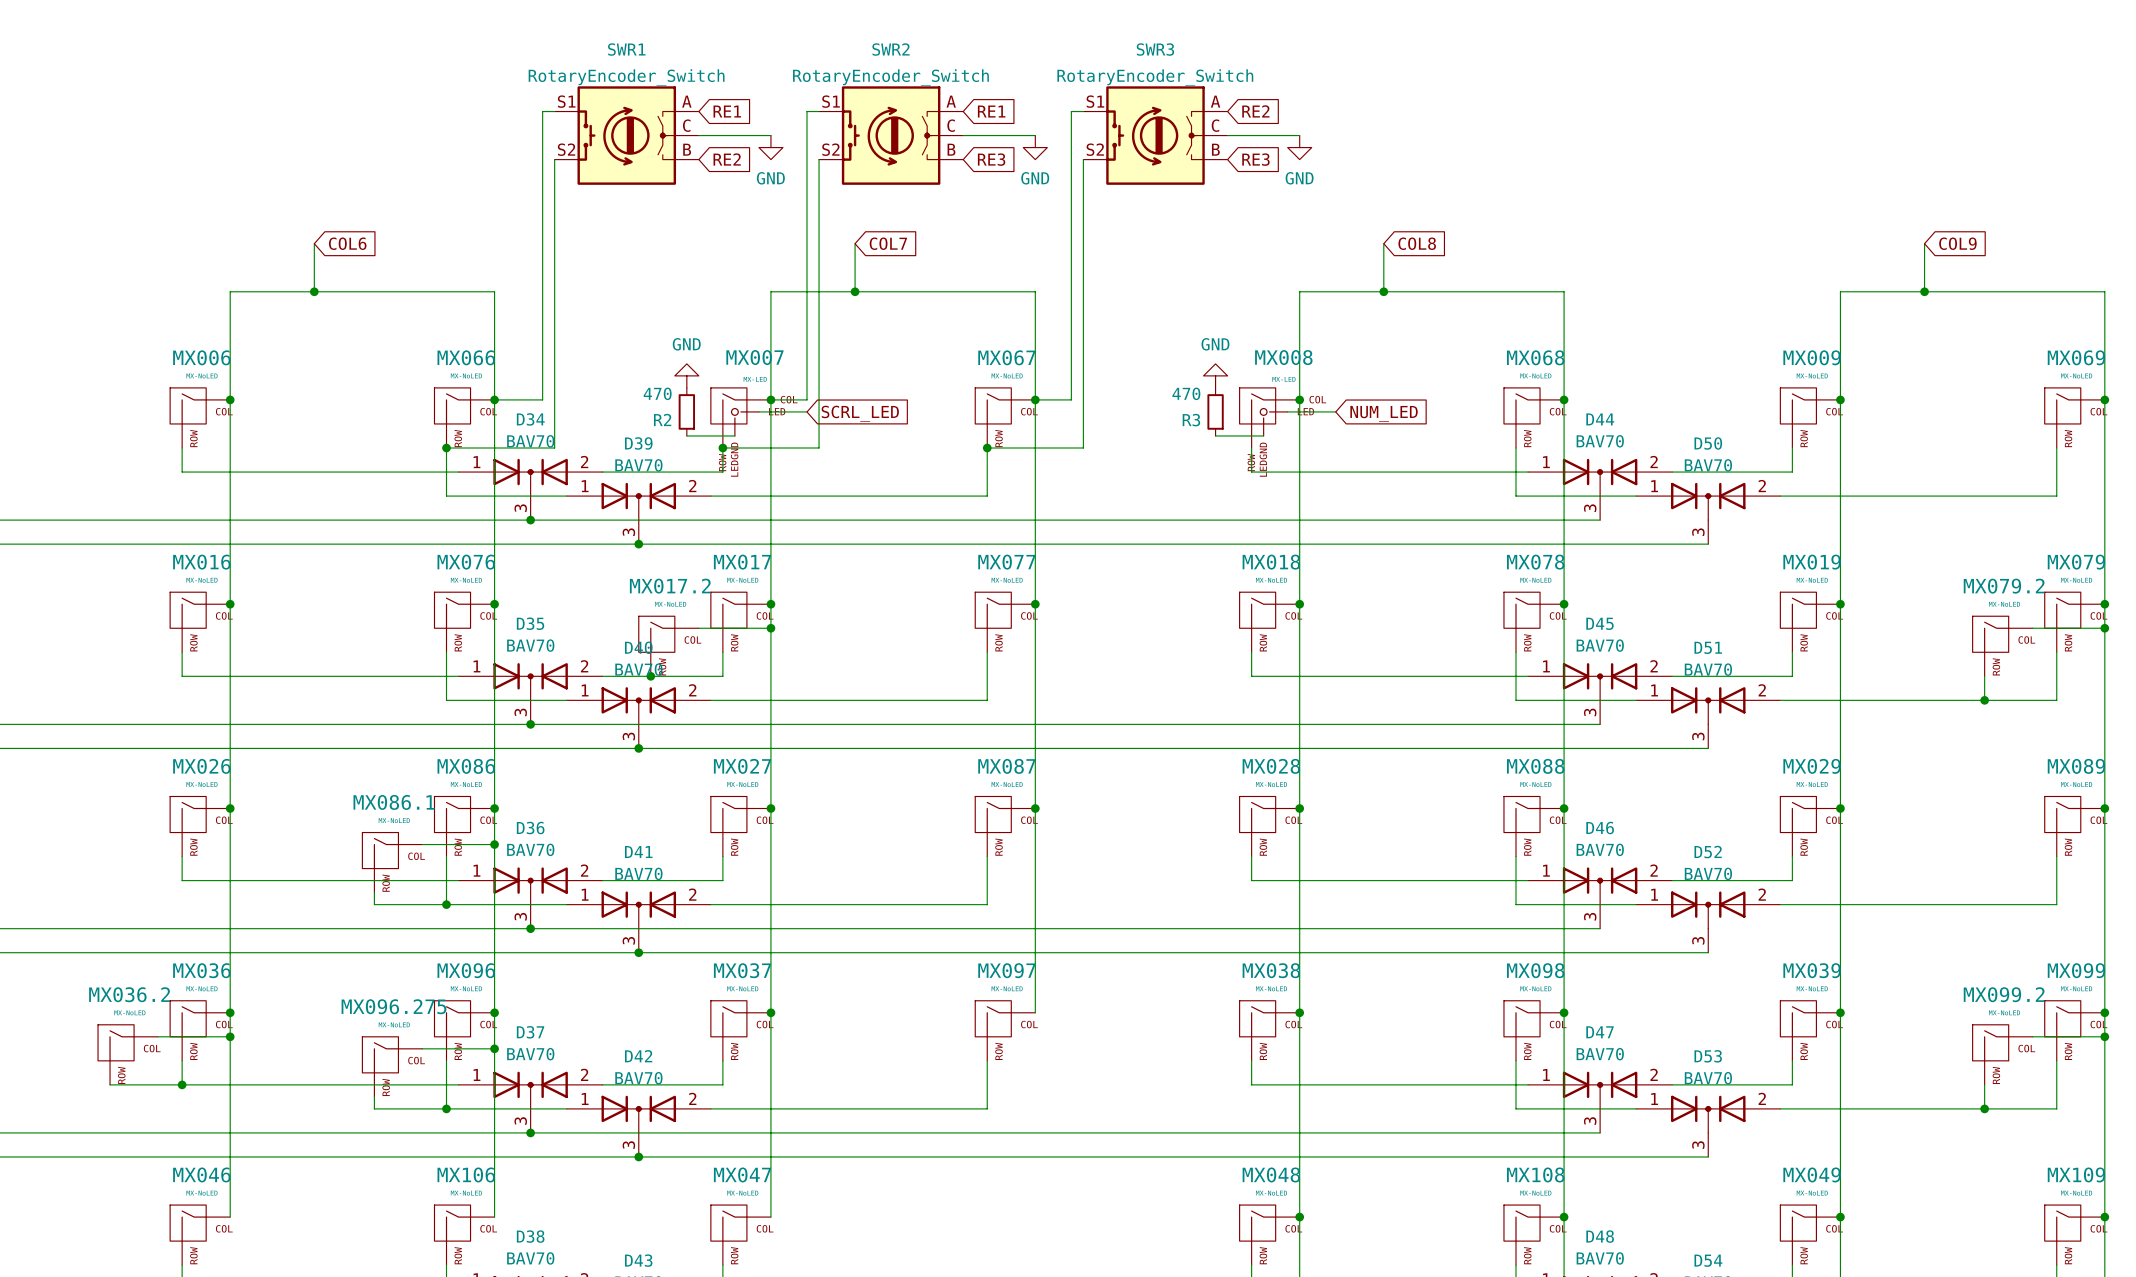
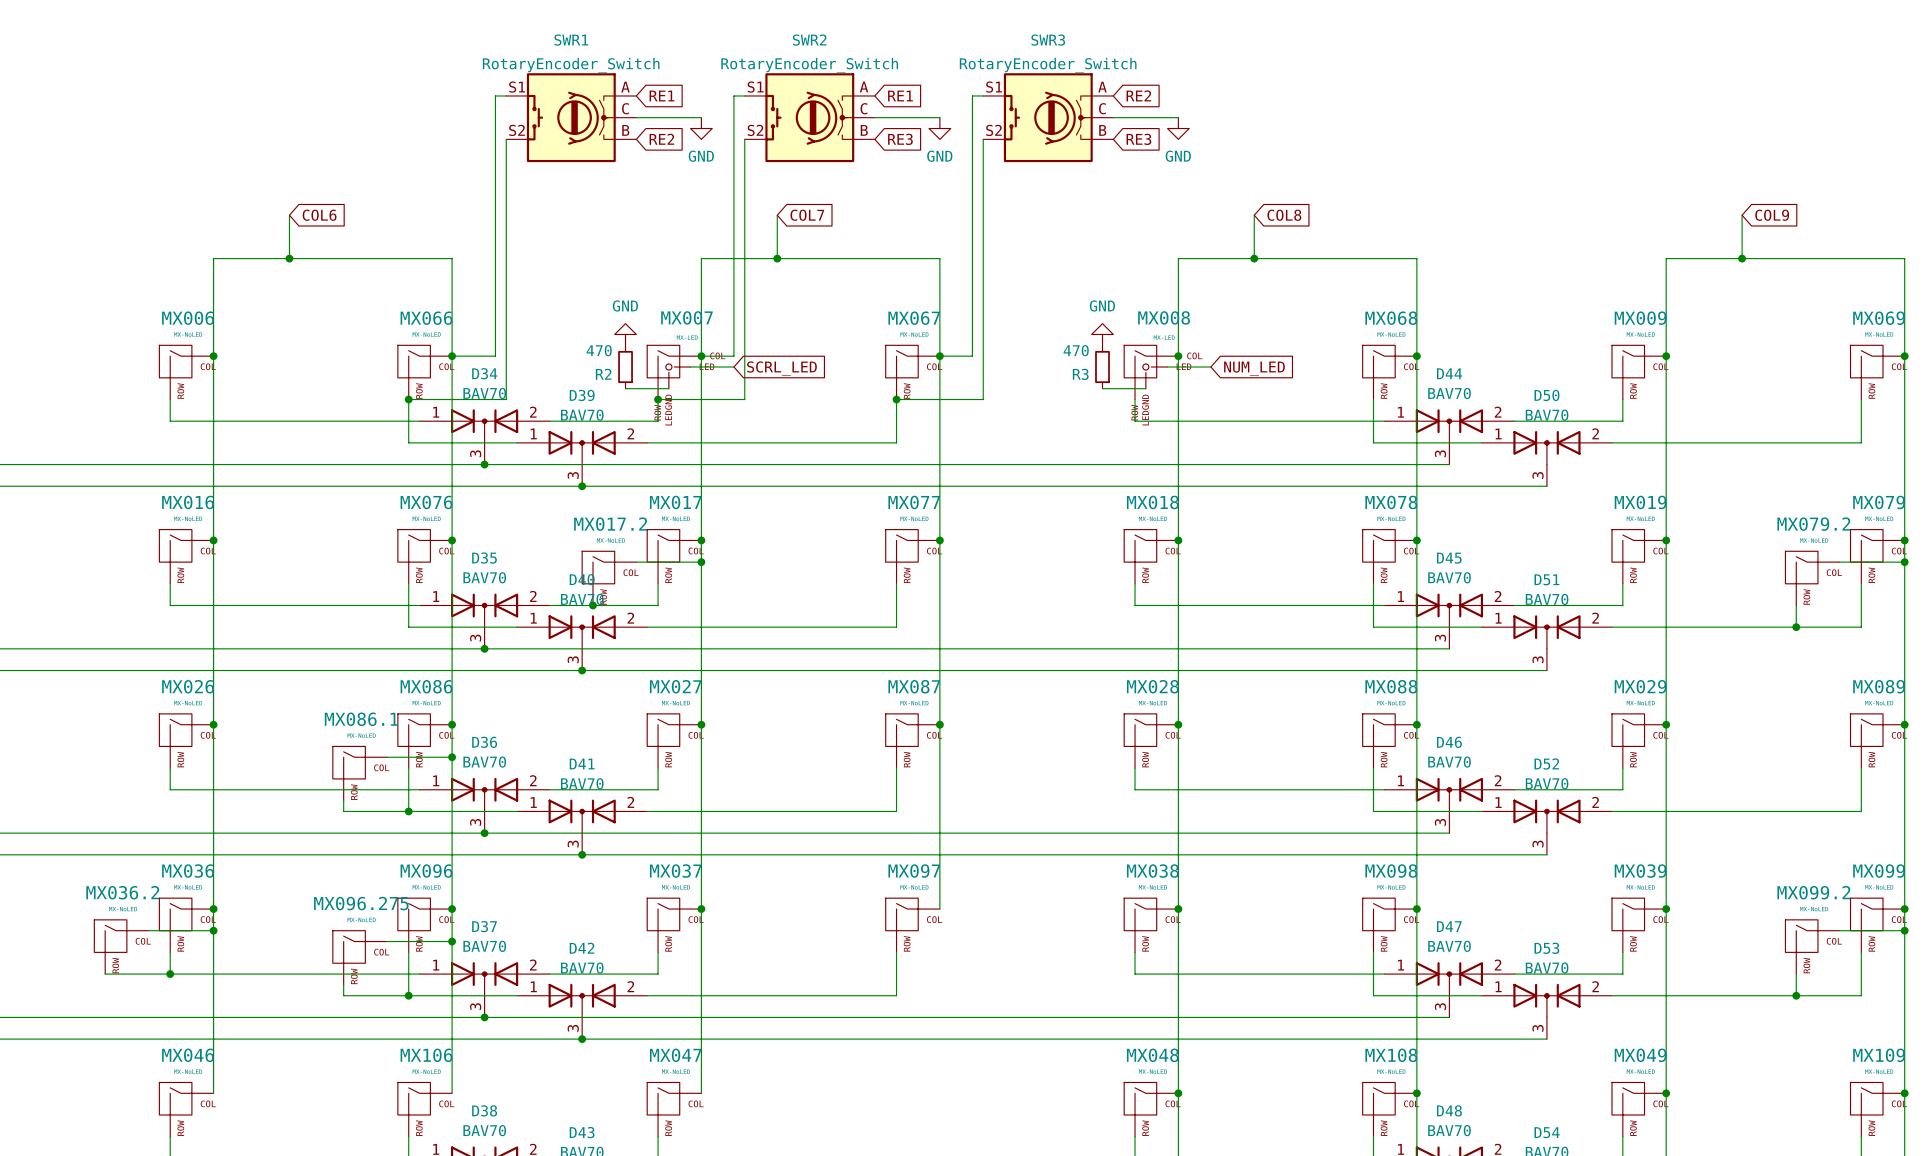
SWR1 symbol: [554, 86, 699, 185] -> [506, 73, 637, 163]
SWR2 symbol: [819, 86, 964, 185] -> [744, 73, 875, 163]
SWR3 symbol: [1083, 86, 1228, 185] -> [983, 73, 1114, 163]

